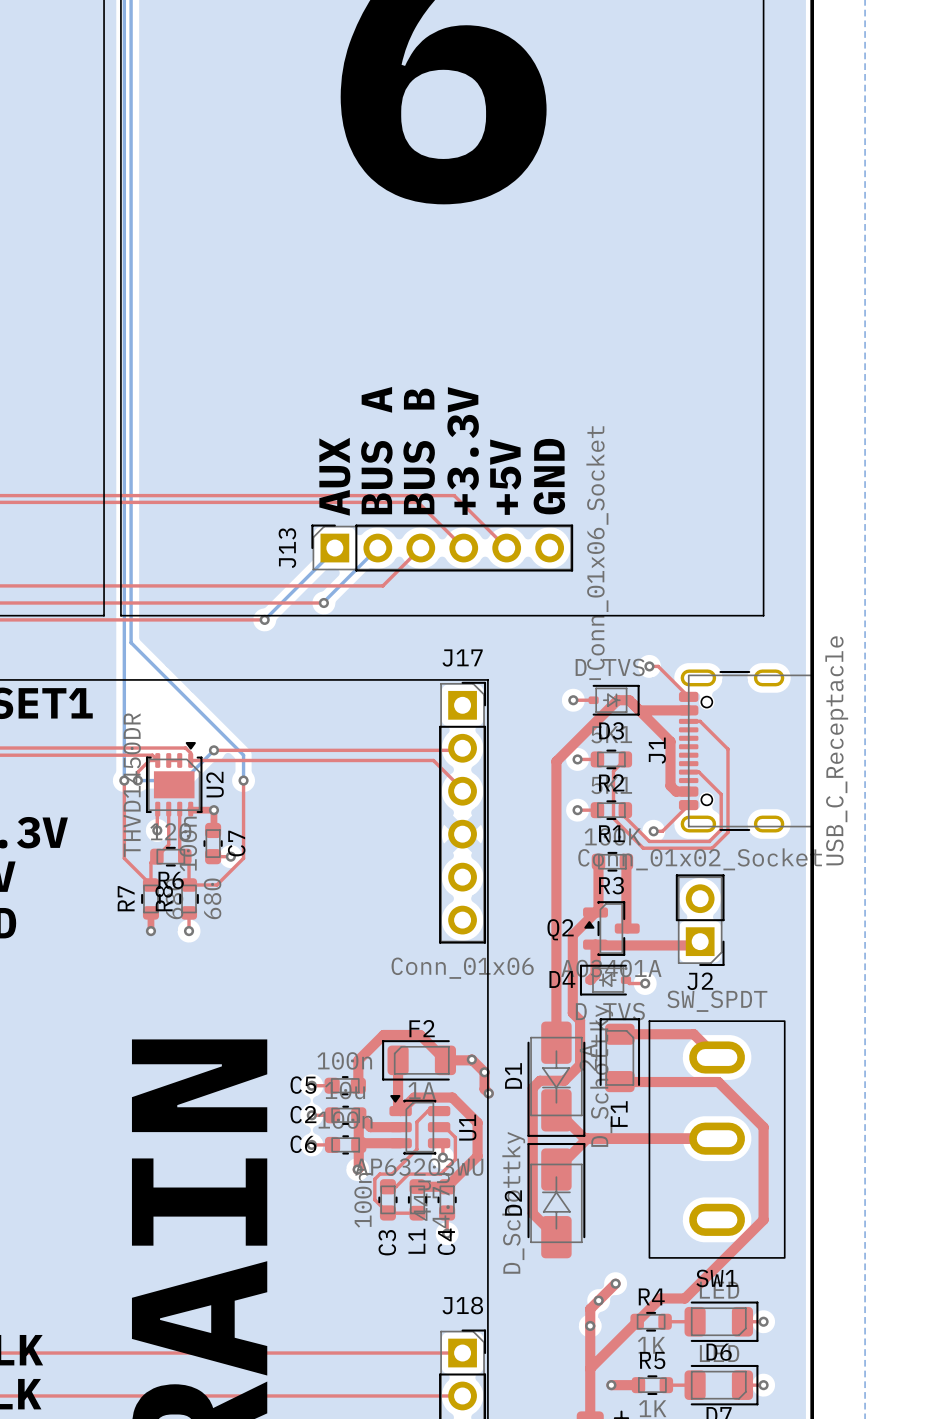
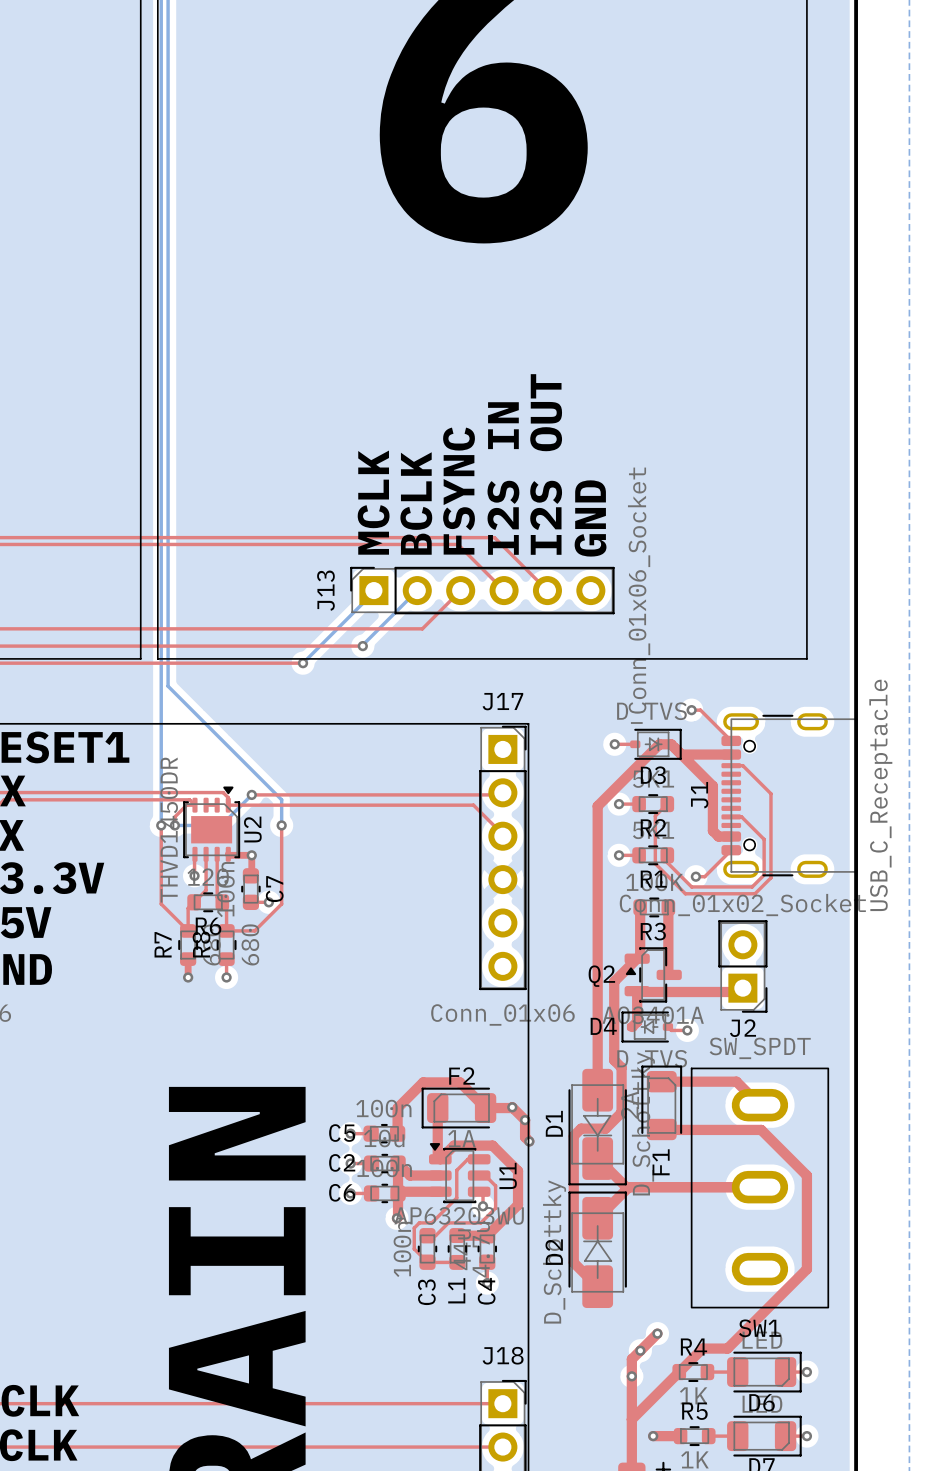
text: BUS A (376, 450) -> BCLK (416, 503)
text: BUS B (419, 451) -> FSYNC (459, 491)
text: +3.3V (463, 451) -> I2S IN (503, 478)
text: AUX (334, 476) -> MCLK (373, 502)
text: +5V (505, 477) -> I2S OUT (546, 464)

